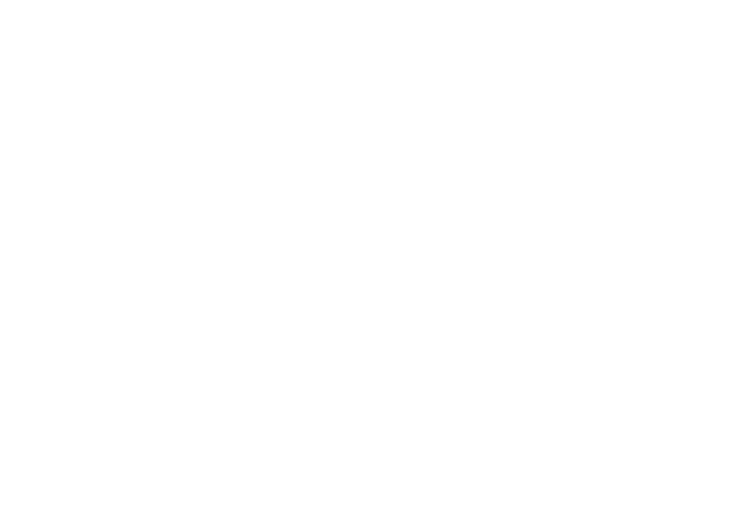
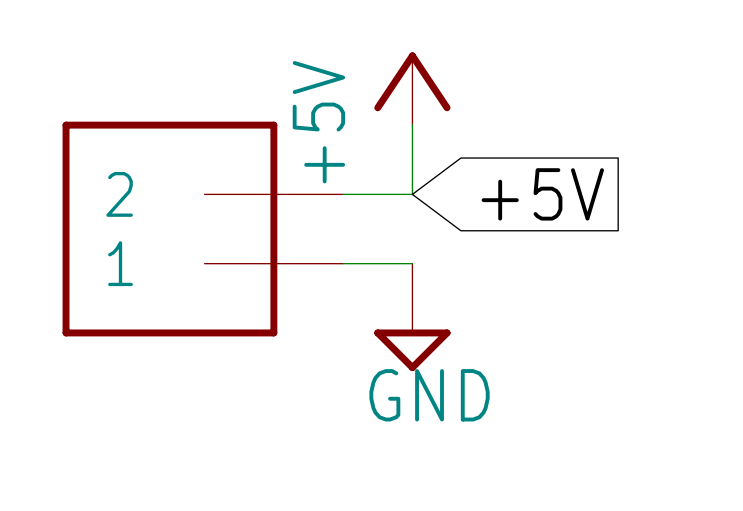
power symbol: none -> +5V (412, 88)
wire: none -> (412, 125) (412, 194) (343, 194)
global label: none -> +5V (542, 194)
part: none -> (202, 229)
wire: none -> (343, 263) (412, 263)
power symbol: none -> GND (412, 317)

